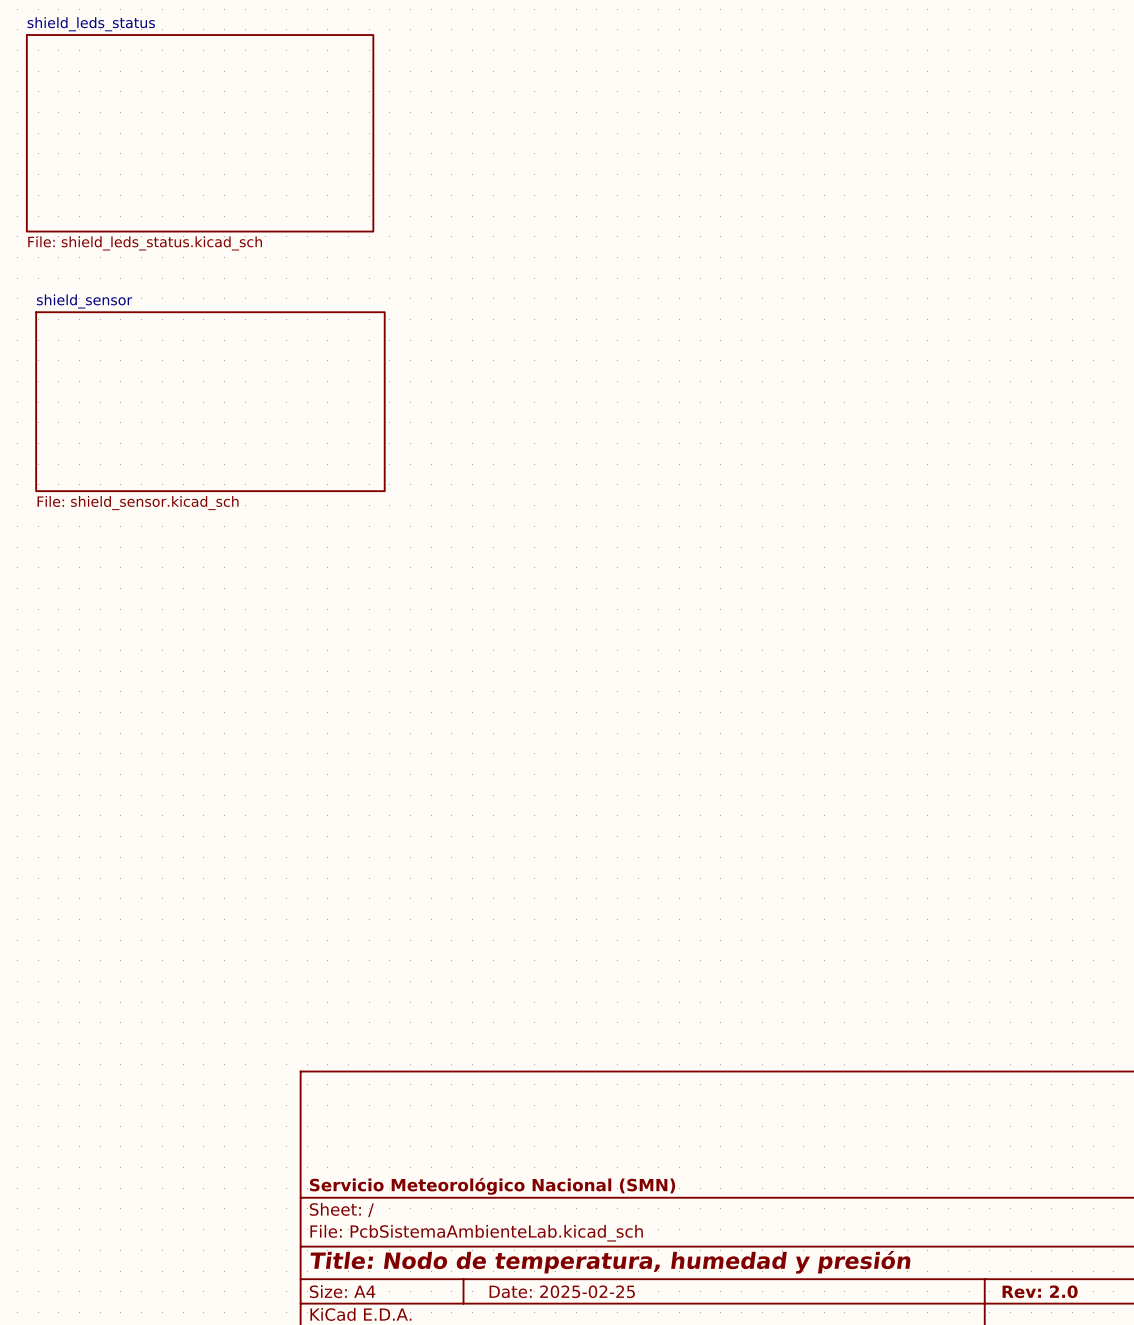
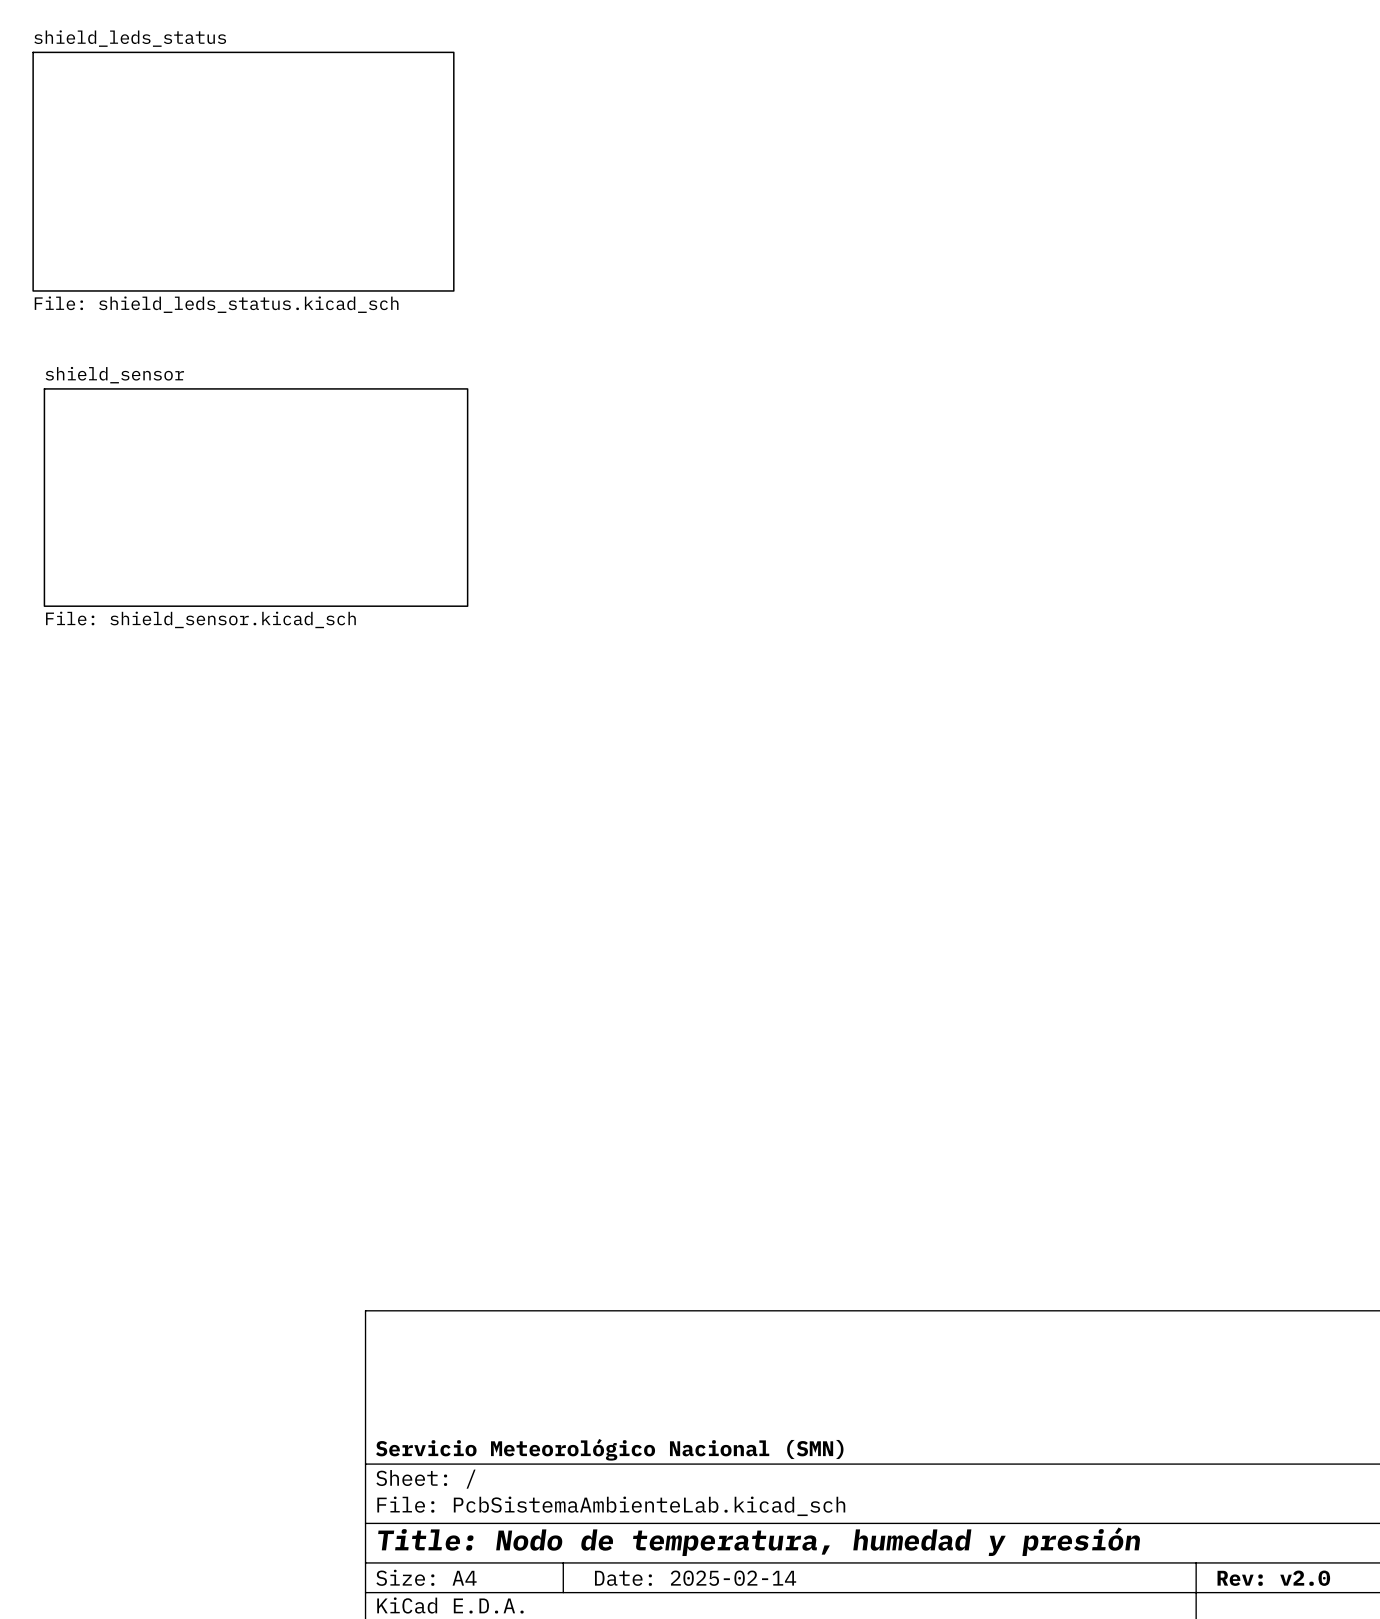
title block: Date: 2025-02-25 (562, 1291) -> Date: 2025-02-14 (695, 1578)
title block: Rev: 2.0 (1040, 1291) -> Rev: v2.0 (1273, 1578)

